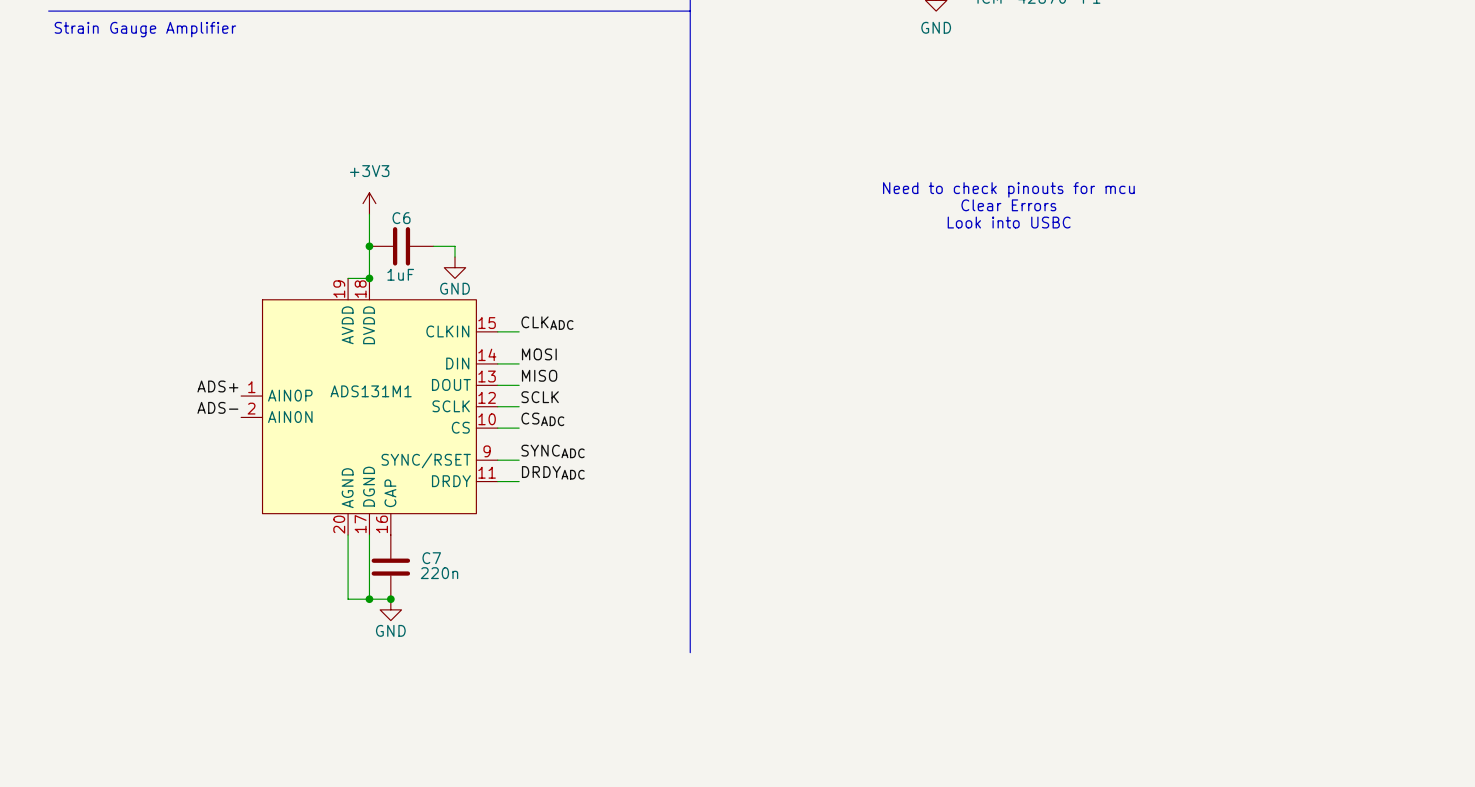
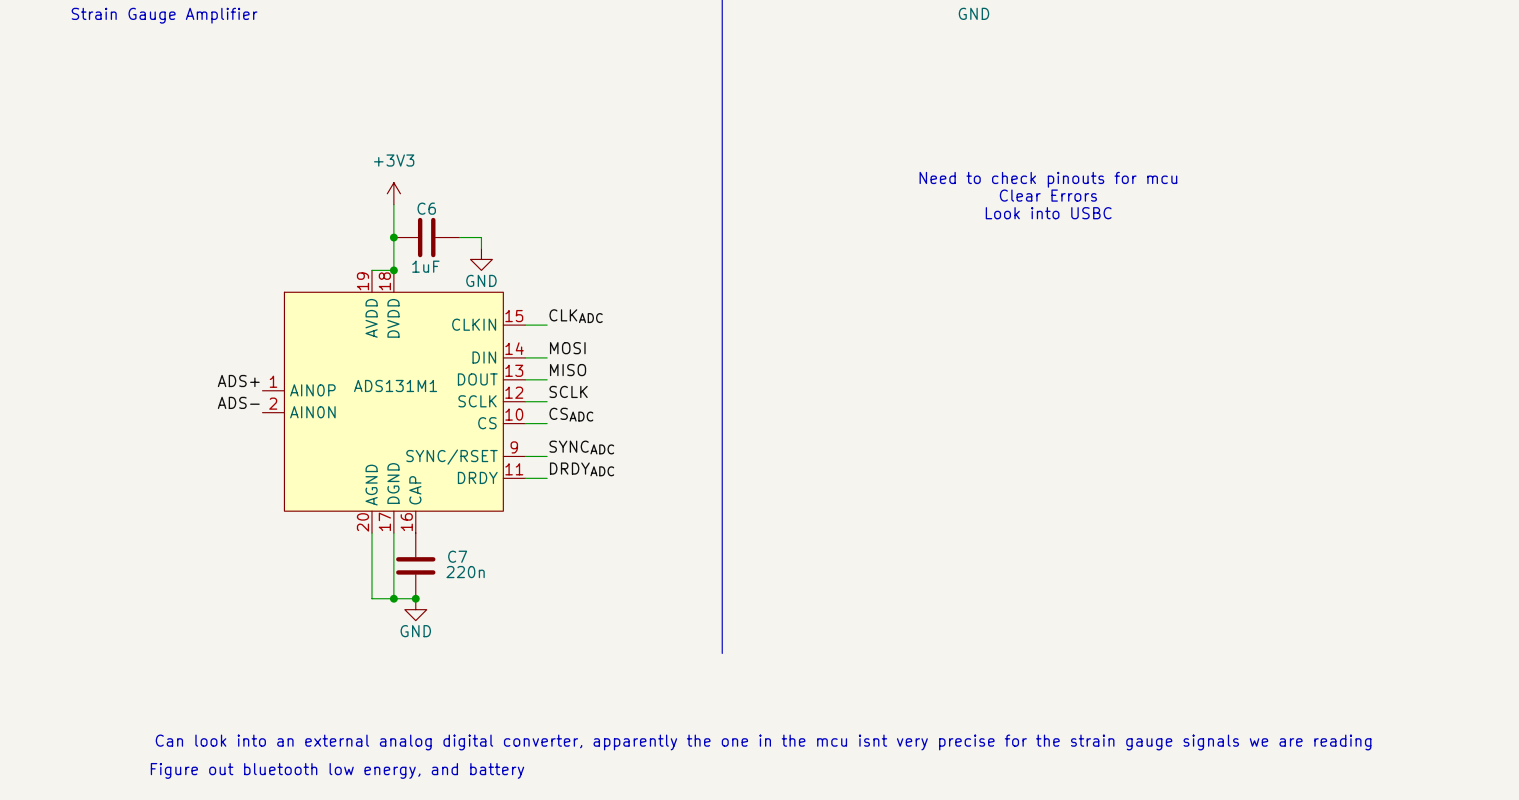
text: none -> Can look into an external analog digital converter, apparently the one in the mcu isnt very precise for the strain gauge signals we are reading (763, 742)
text: none -> Figure out bluetooth low energy, and battery (337, 770)

